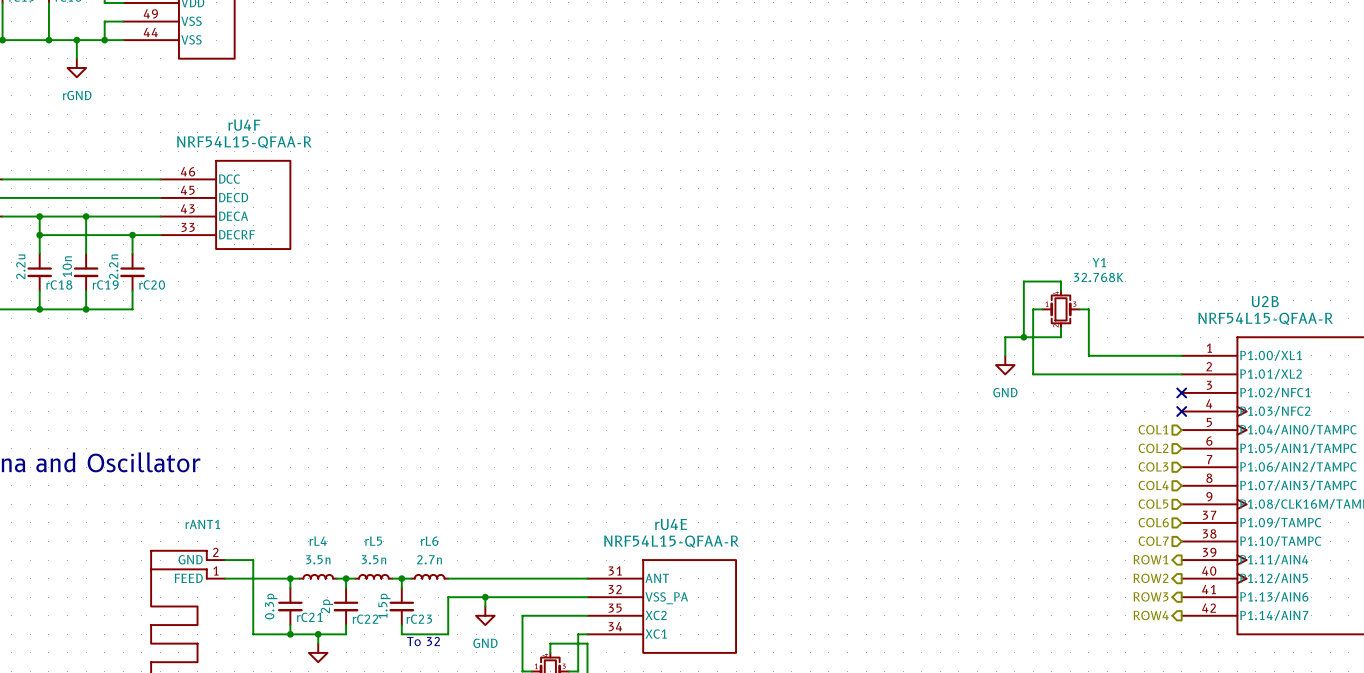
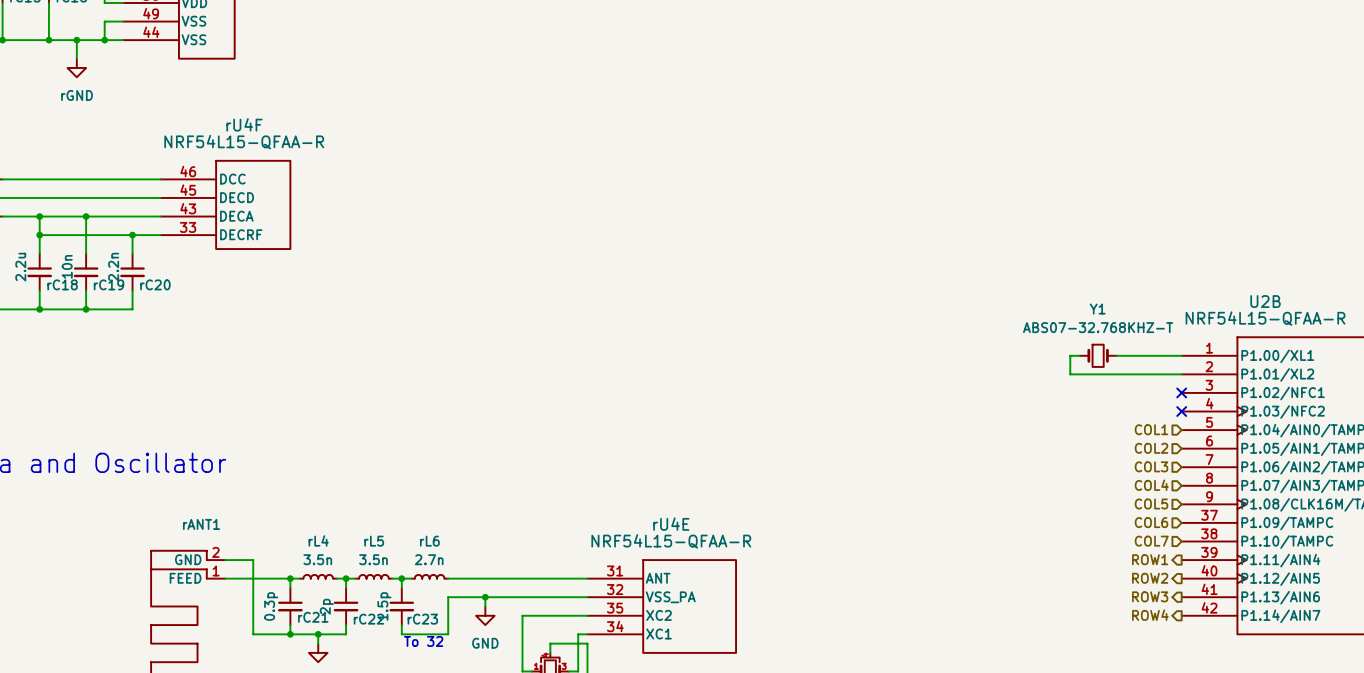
Y1 name position: Y1 (1099, 262) -> Y1 (1097, 309)
Y1 value: 32.768K (1098, 277) -> ABS07-32.768KHZ-T (1098, 327)
Y1 symbol: [1042, 290, 1080, 328] -> [1079, 344, 1117, 367]
wire: (1061, 290) (1061, 281) (1023, 281) (1023, 337) -> none
wire: (1042, 309) (1033, 309) (1033, 374) (1070, 374) -> (1079, 355) (1070, 355) (1070, 374)
wire: (1079, 309) (1088, 309) (1088, 355) (1116, 355) -> none
wire: (1061, 327) (1061, 337) (1005, 337) (1005, 355) -> none
junction: (1023, 337) -> none
power symbol: GND (1005, 365) -> none

